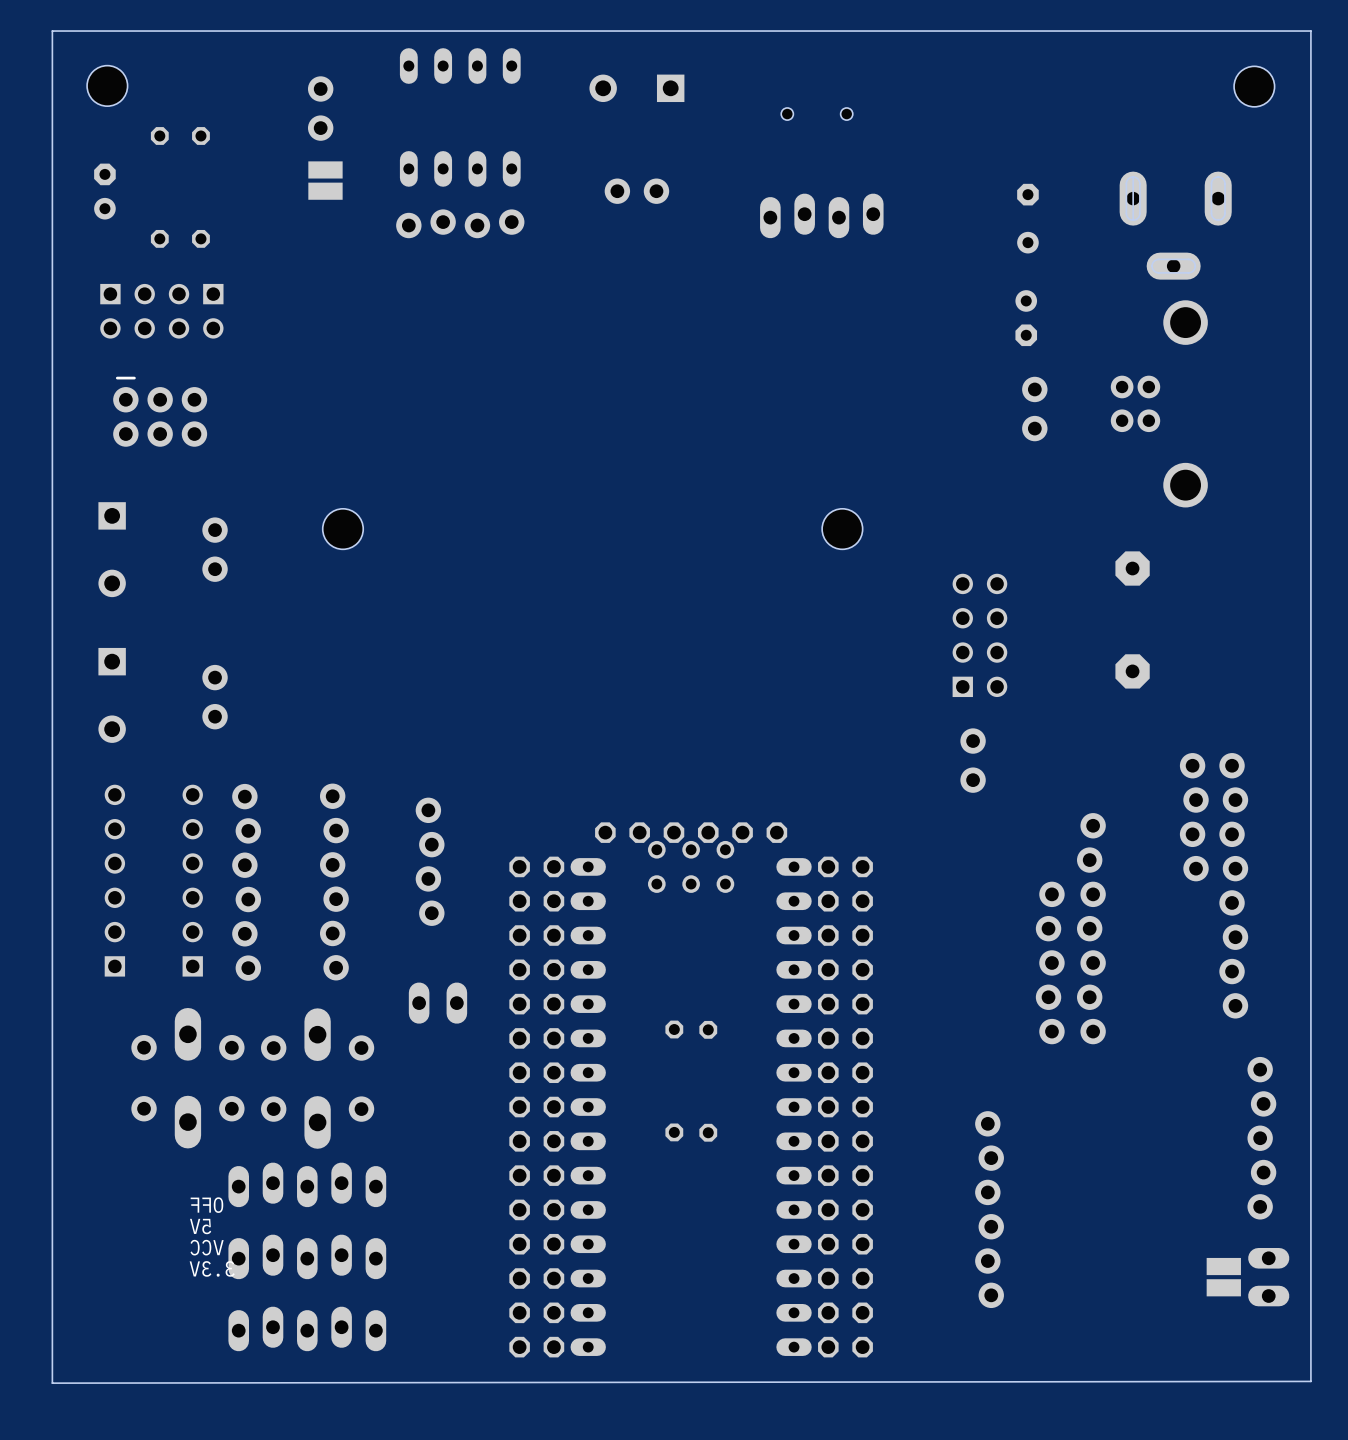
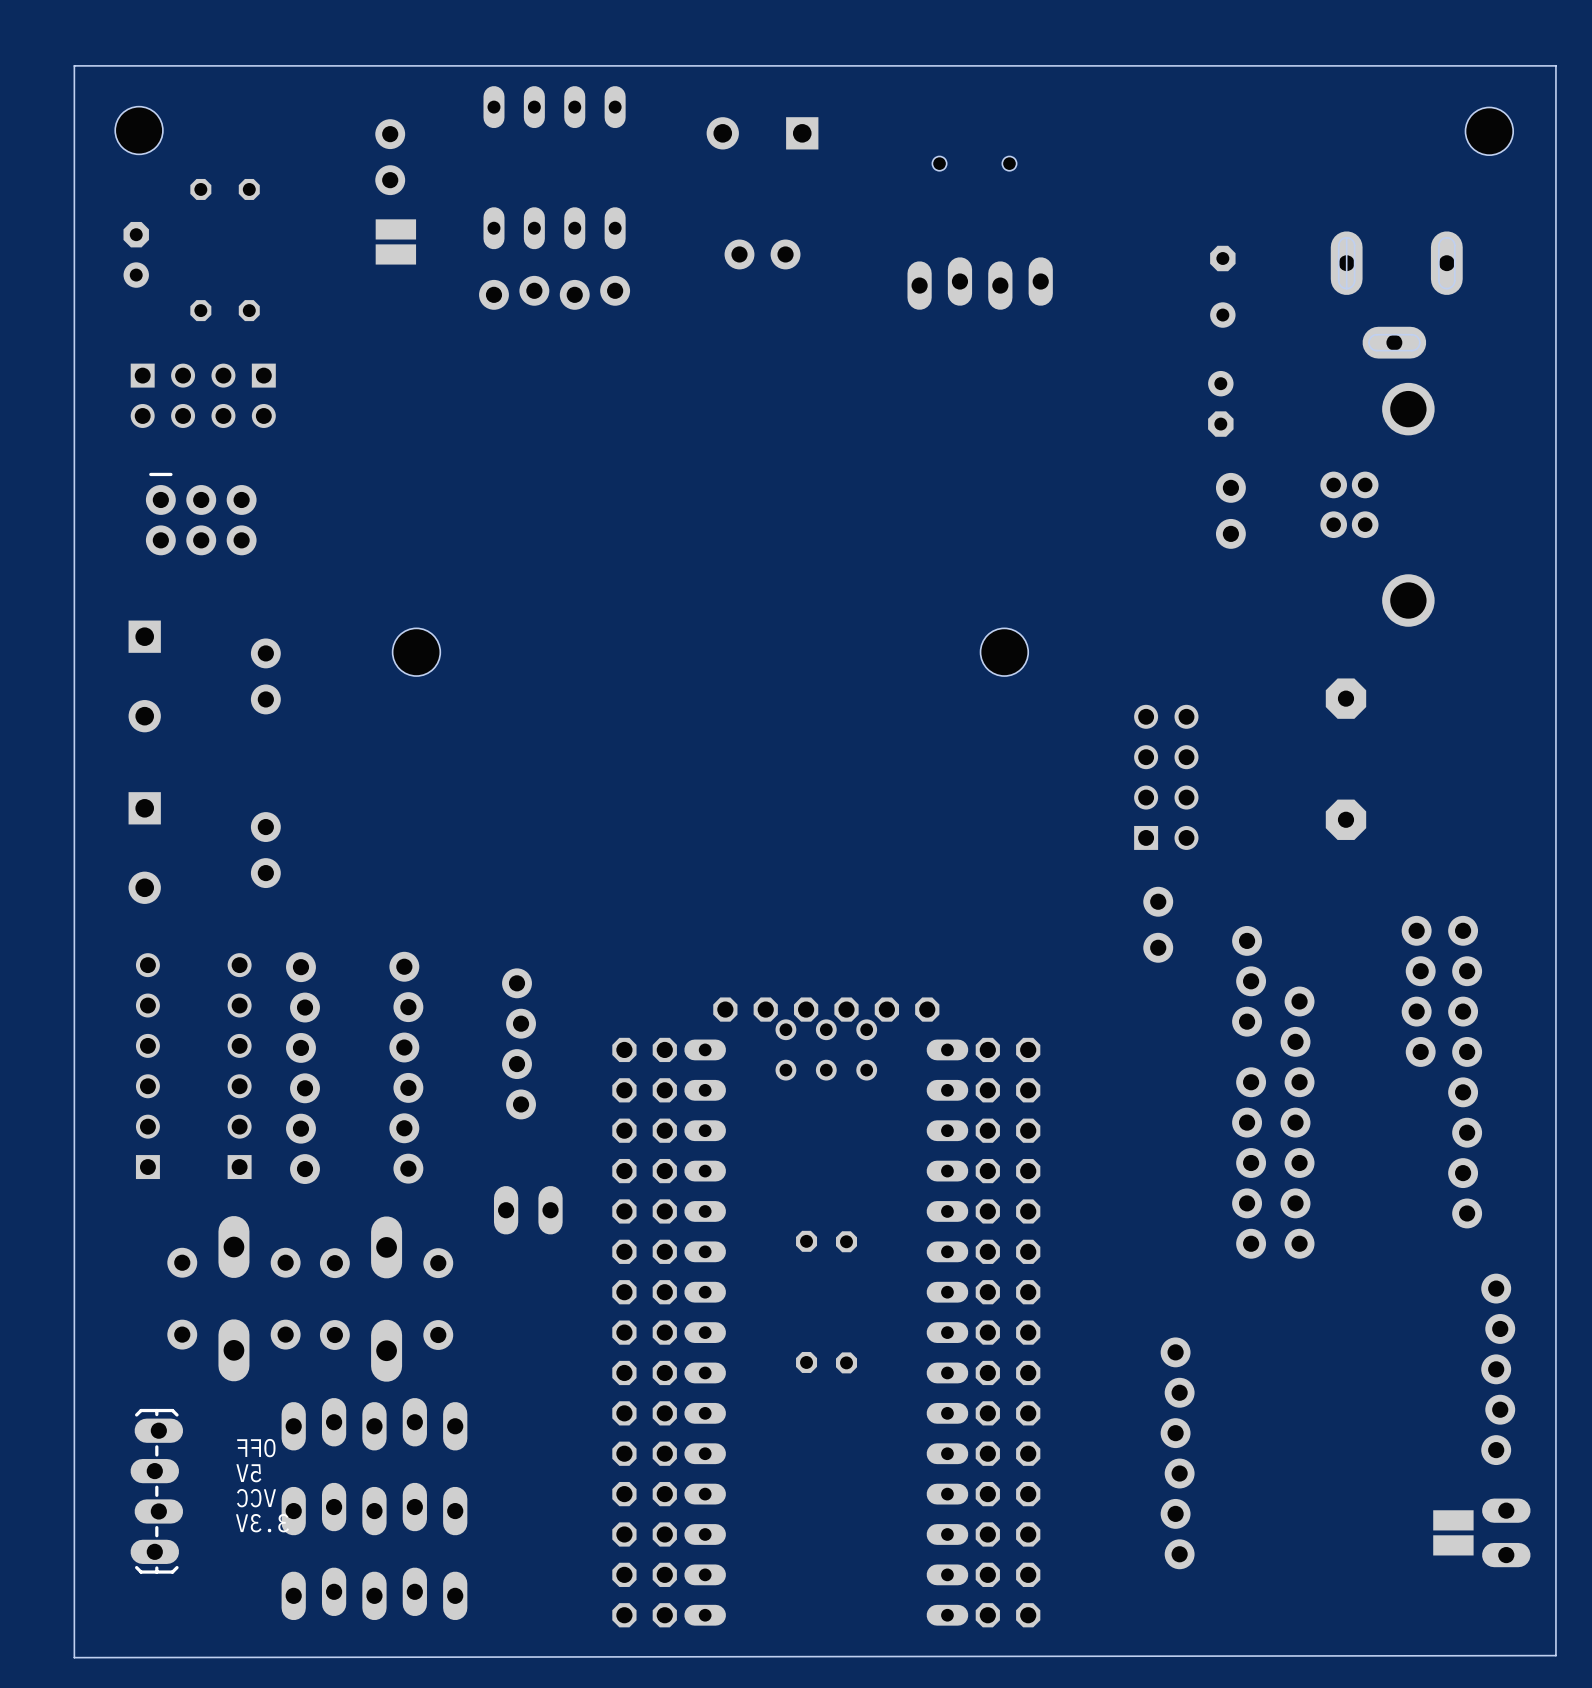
part: none -> (1249, 981)
part: none -> (156, 1491)

